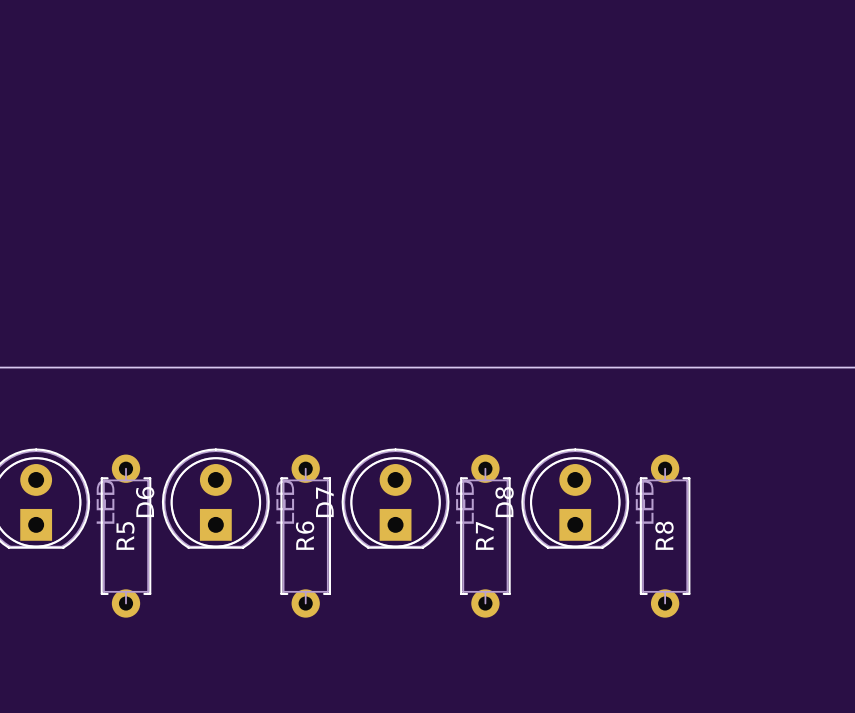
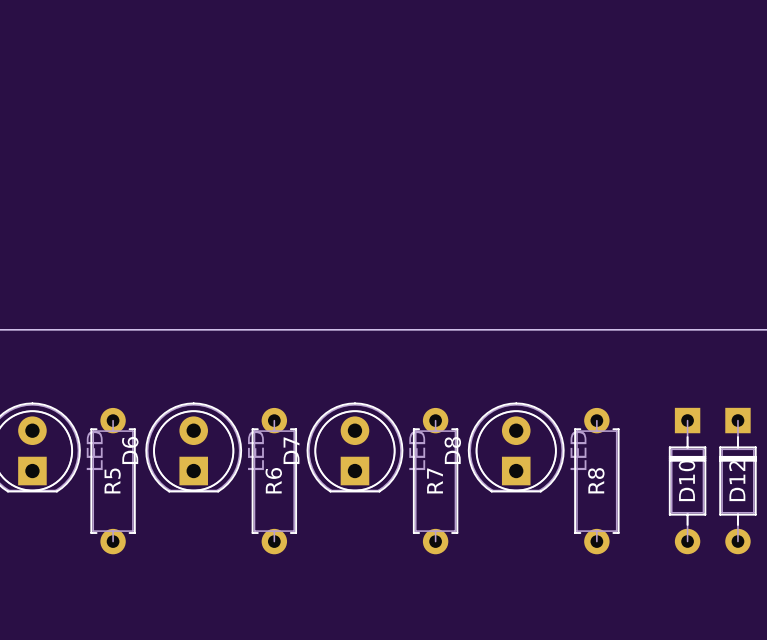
D10: none -> (687, 481)
D12: none -> (737, 481)

